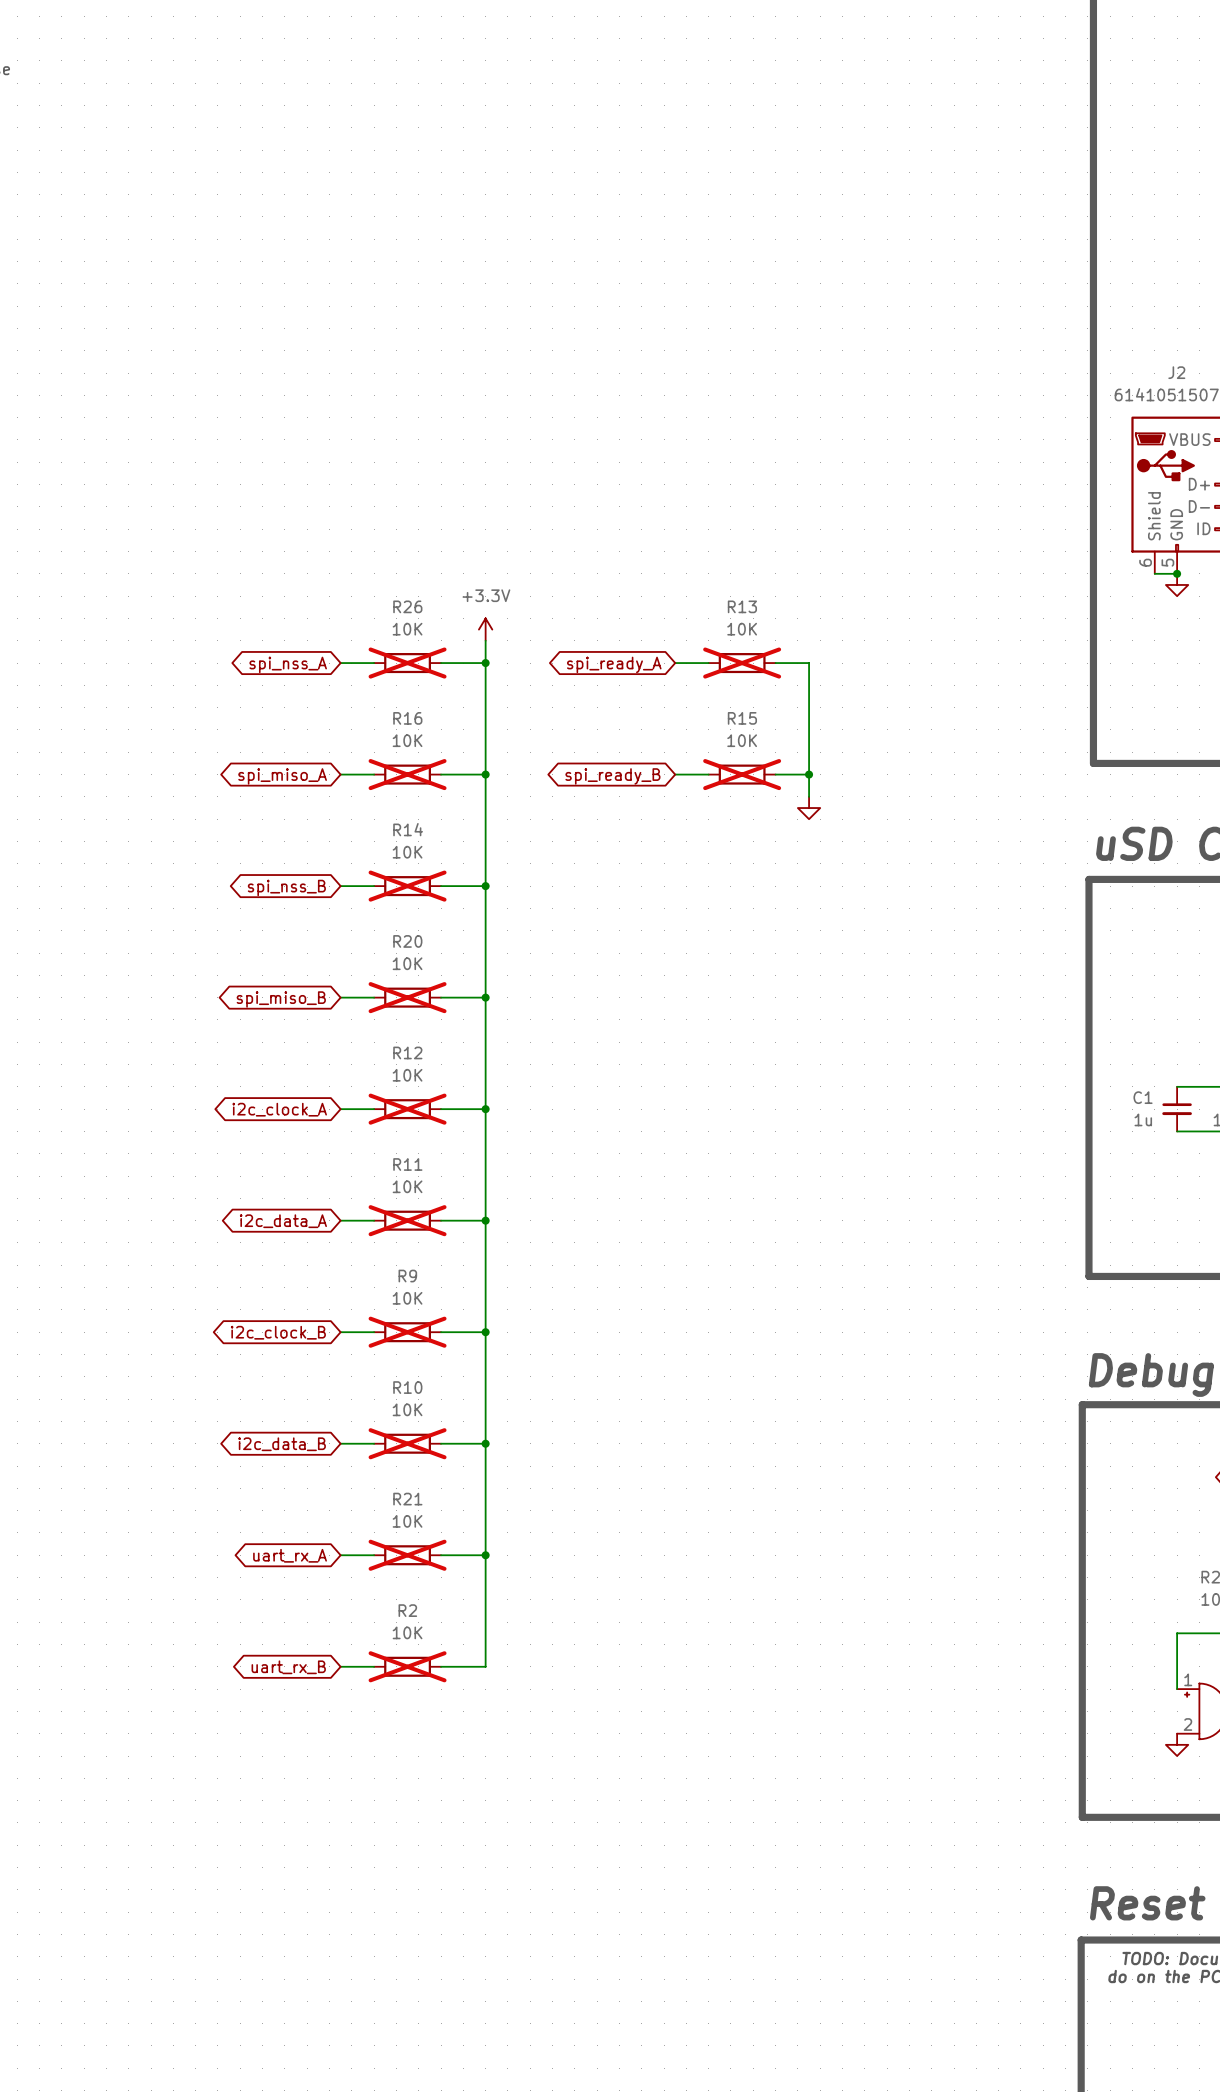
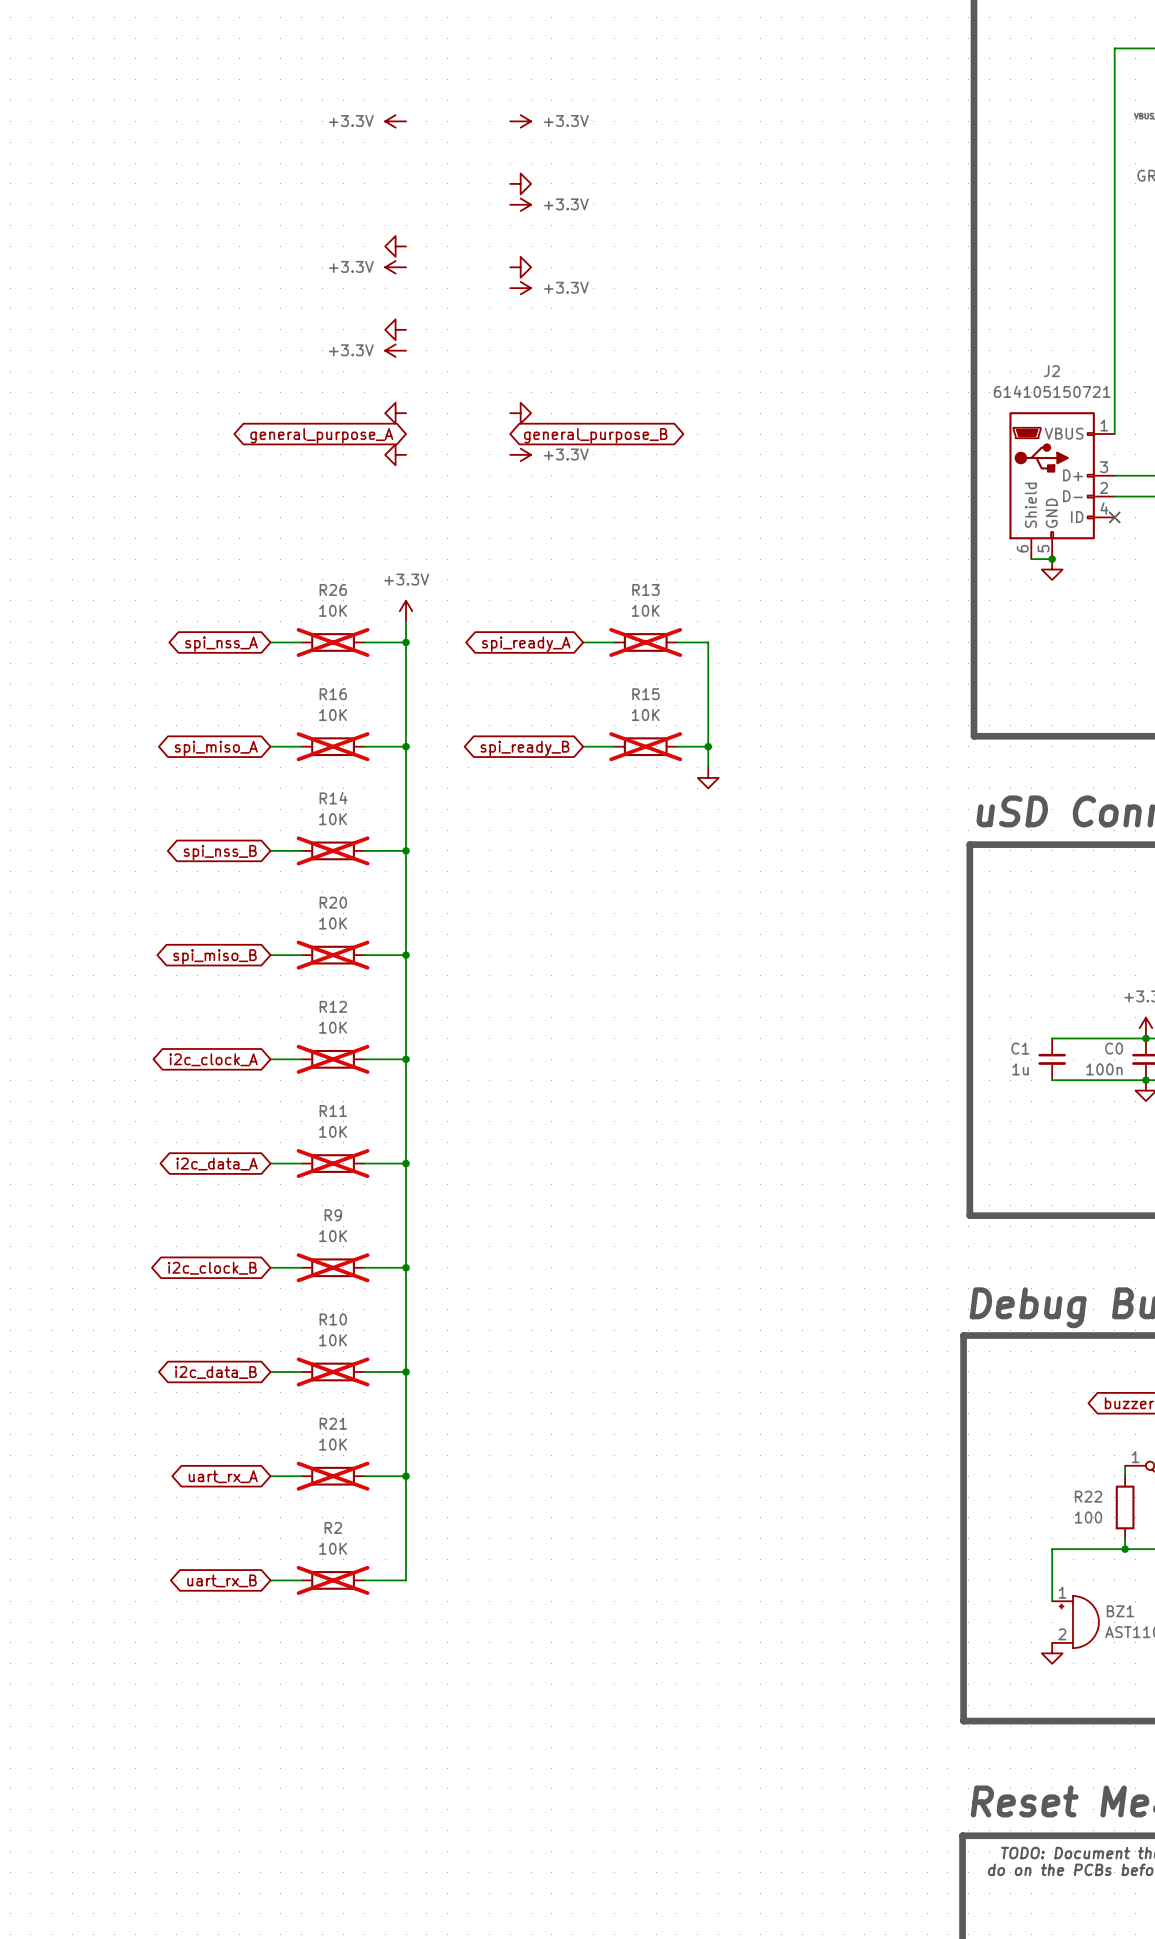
power symbol: none -> +3.3V (395, 121)
power symbol: none -> +3.3V (520, 121)
power symbol: none -> (520, 183)
power symbol: none -> +3.3V (520, 204)
power symbol: none -> (395, 246)
power symbol: none -> +3.3V (395, 267)
power symbol: none -> (520, 267)
power symbol: none -> +3.3V (520, 288)
power symbol: none -> (395, 329)
power symbol: none -> +3.3V (395, 350)
power symbol: none -> (395, 413)
power symbol: none -> (520, 413)
global label: none -> general_purpose_A (321, 435)
global label: none -> general_purpose_B (595, 435)
power symbol: none -> (395, 454)
power symbol: none -> +3.3V (520, 454)

